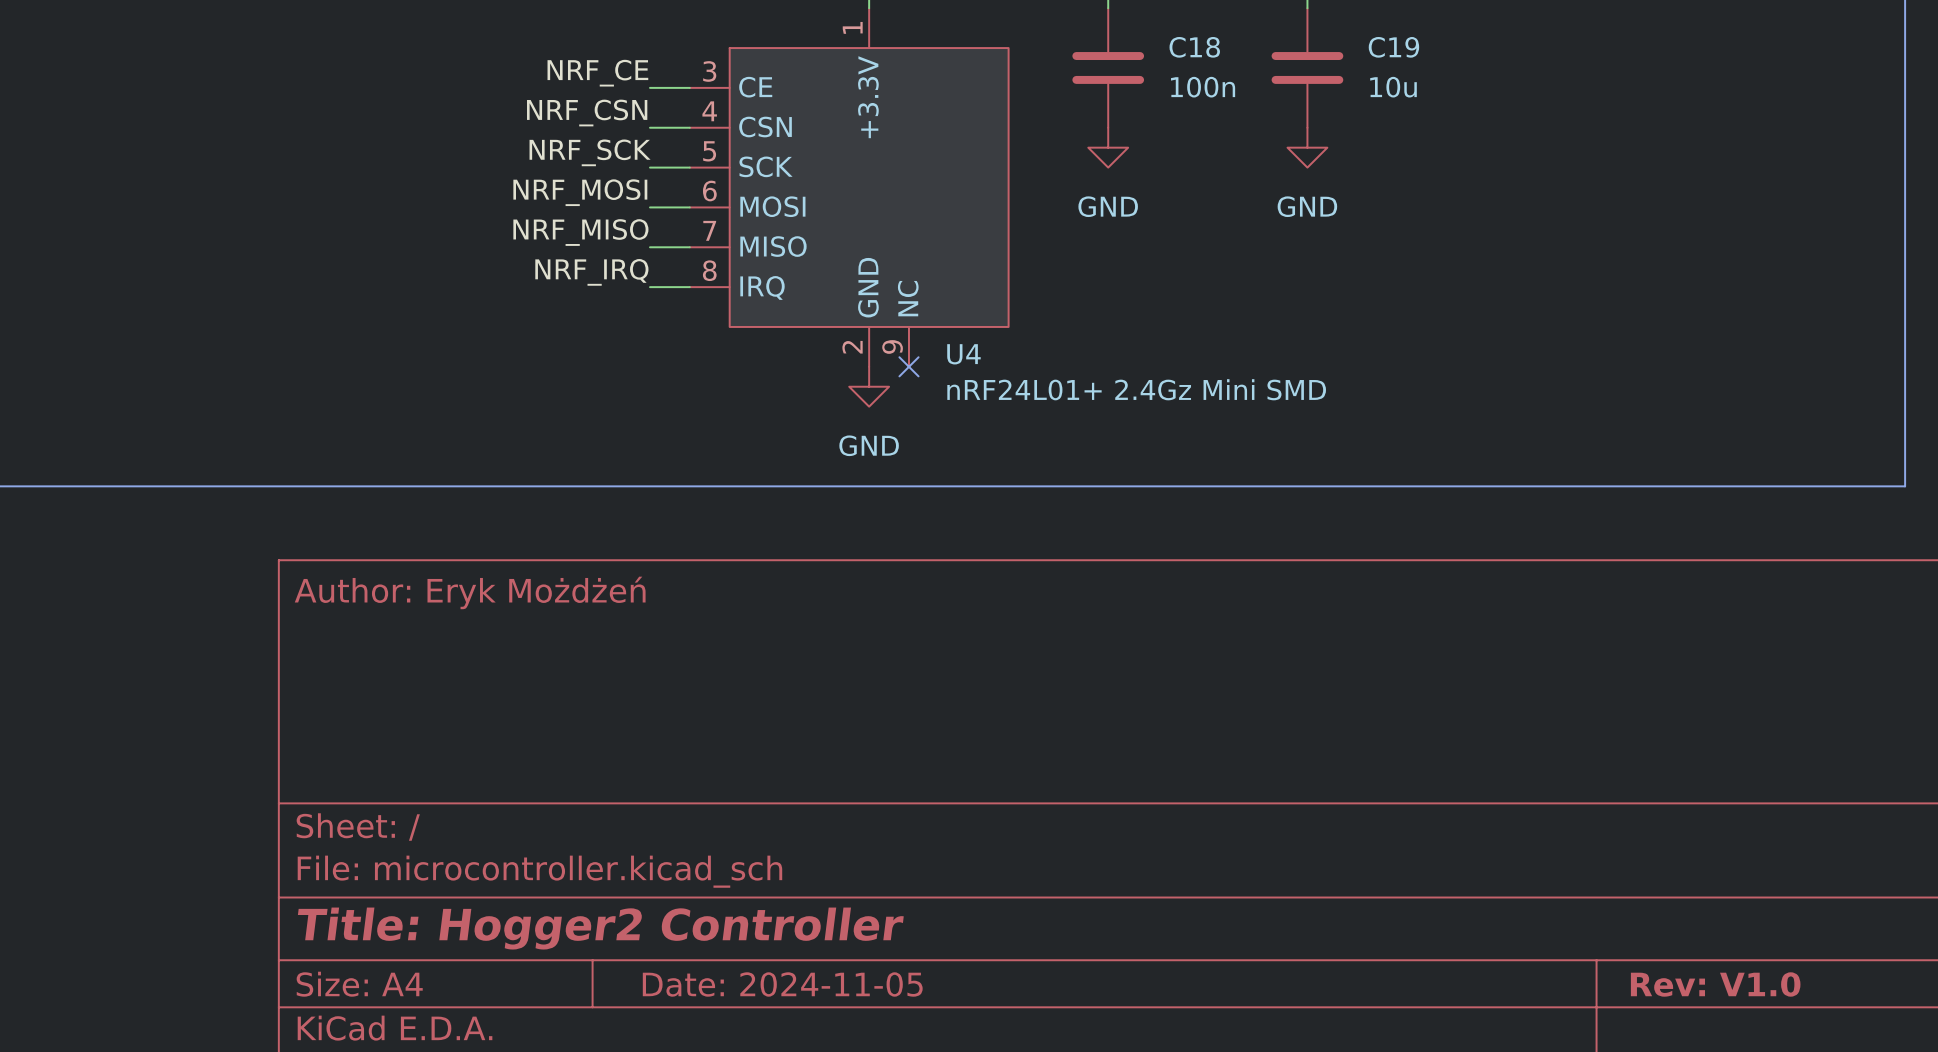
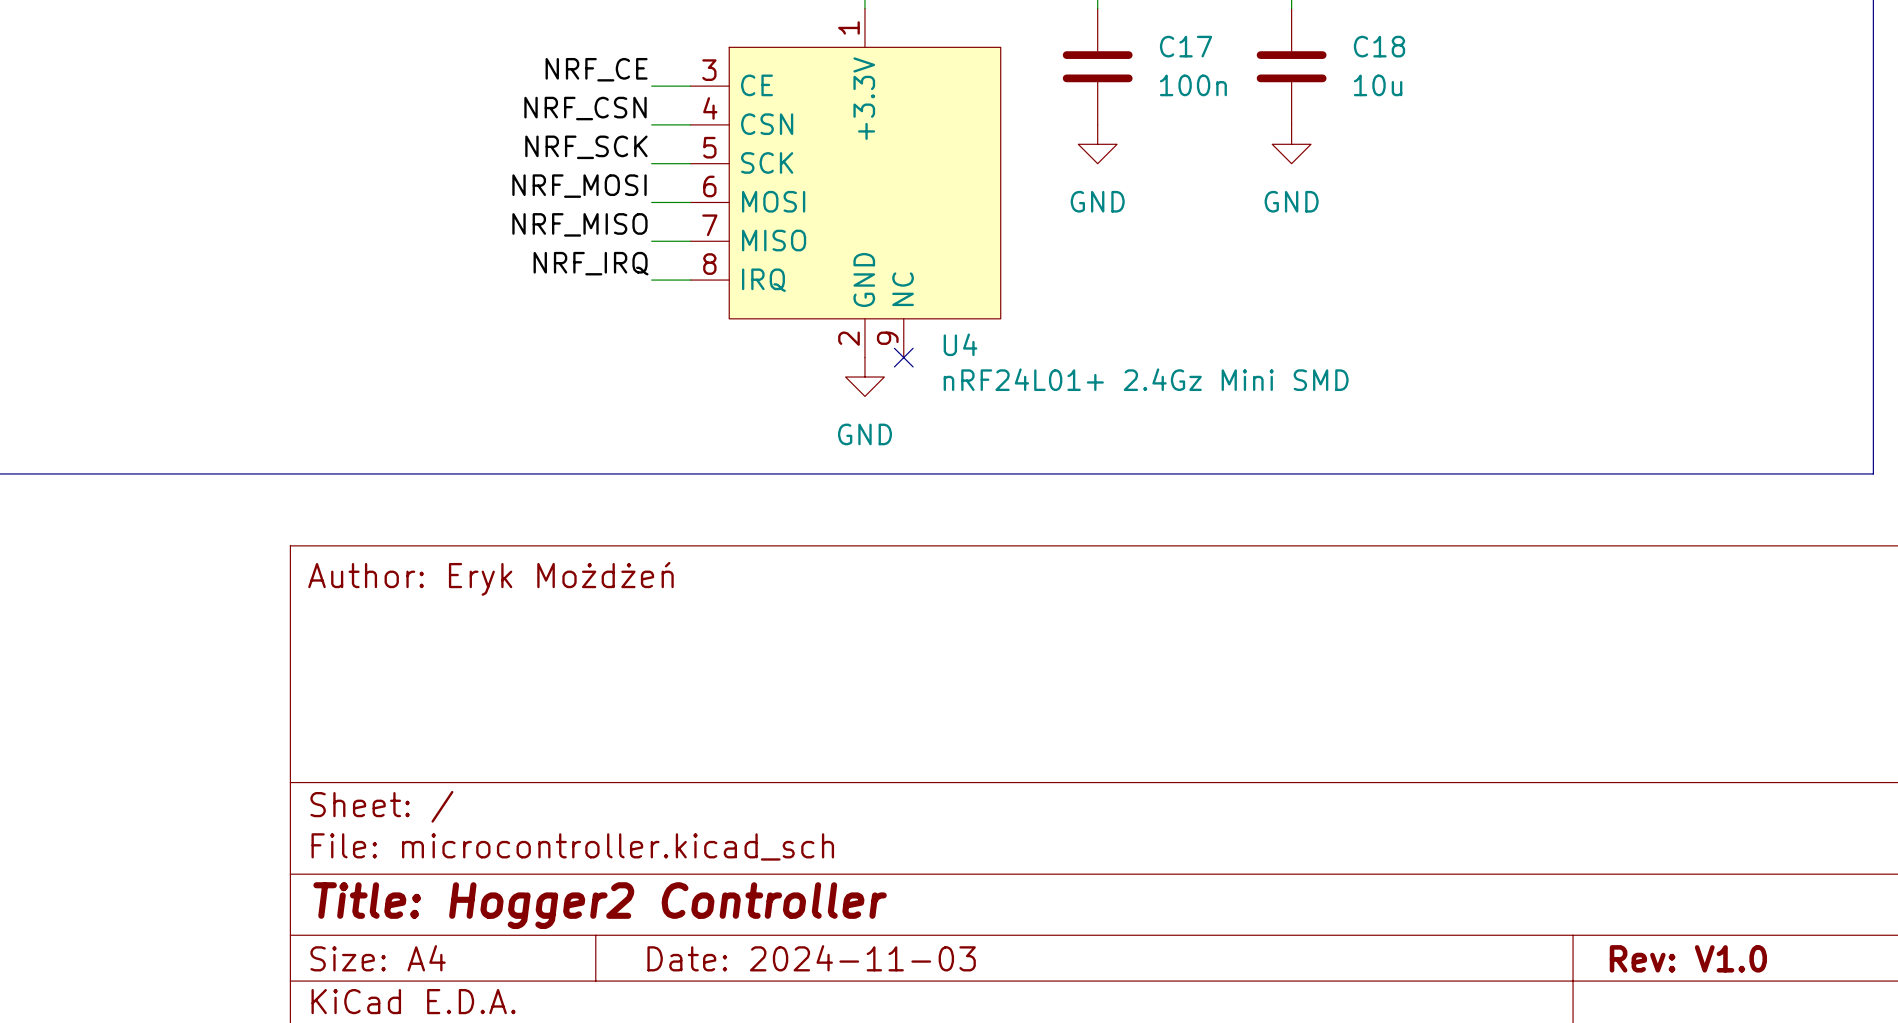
C18 name: C18 (1194, 47) -> C17 (1186, 46)
C19 name: C19 (1393, 47) -> C18 (1379, 46)
title block: Date: 2024-11-05 (782, 984) -> Date: 2024-11-03 (811, 958)

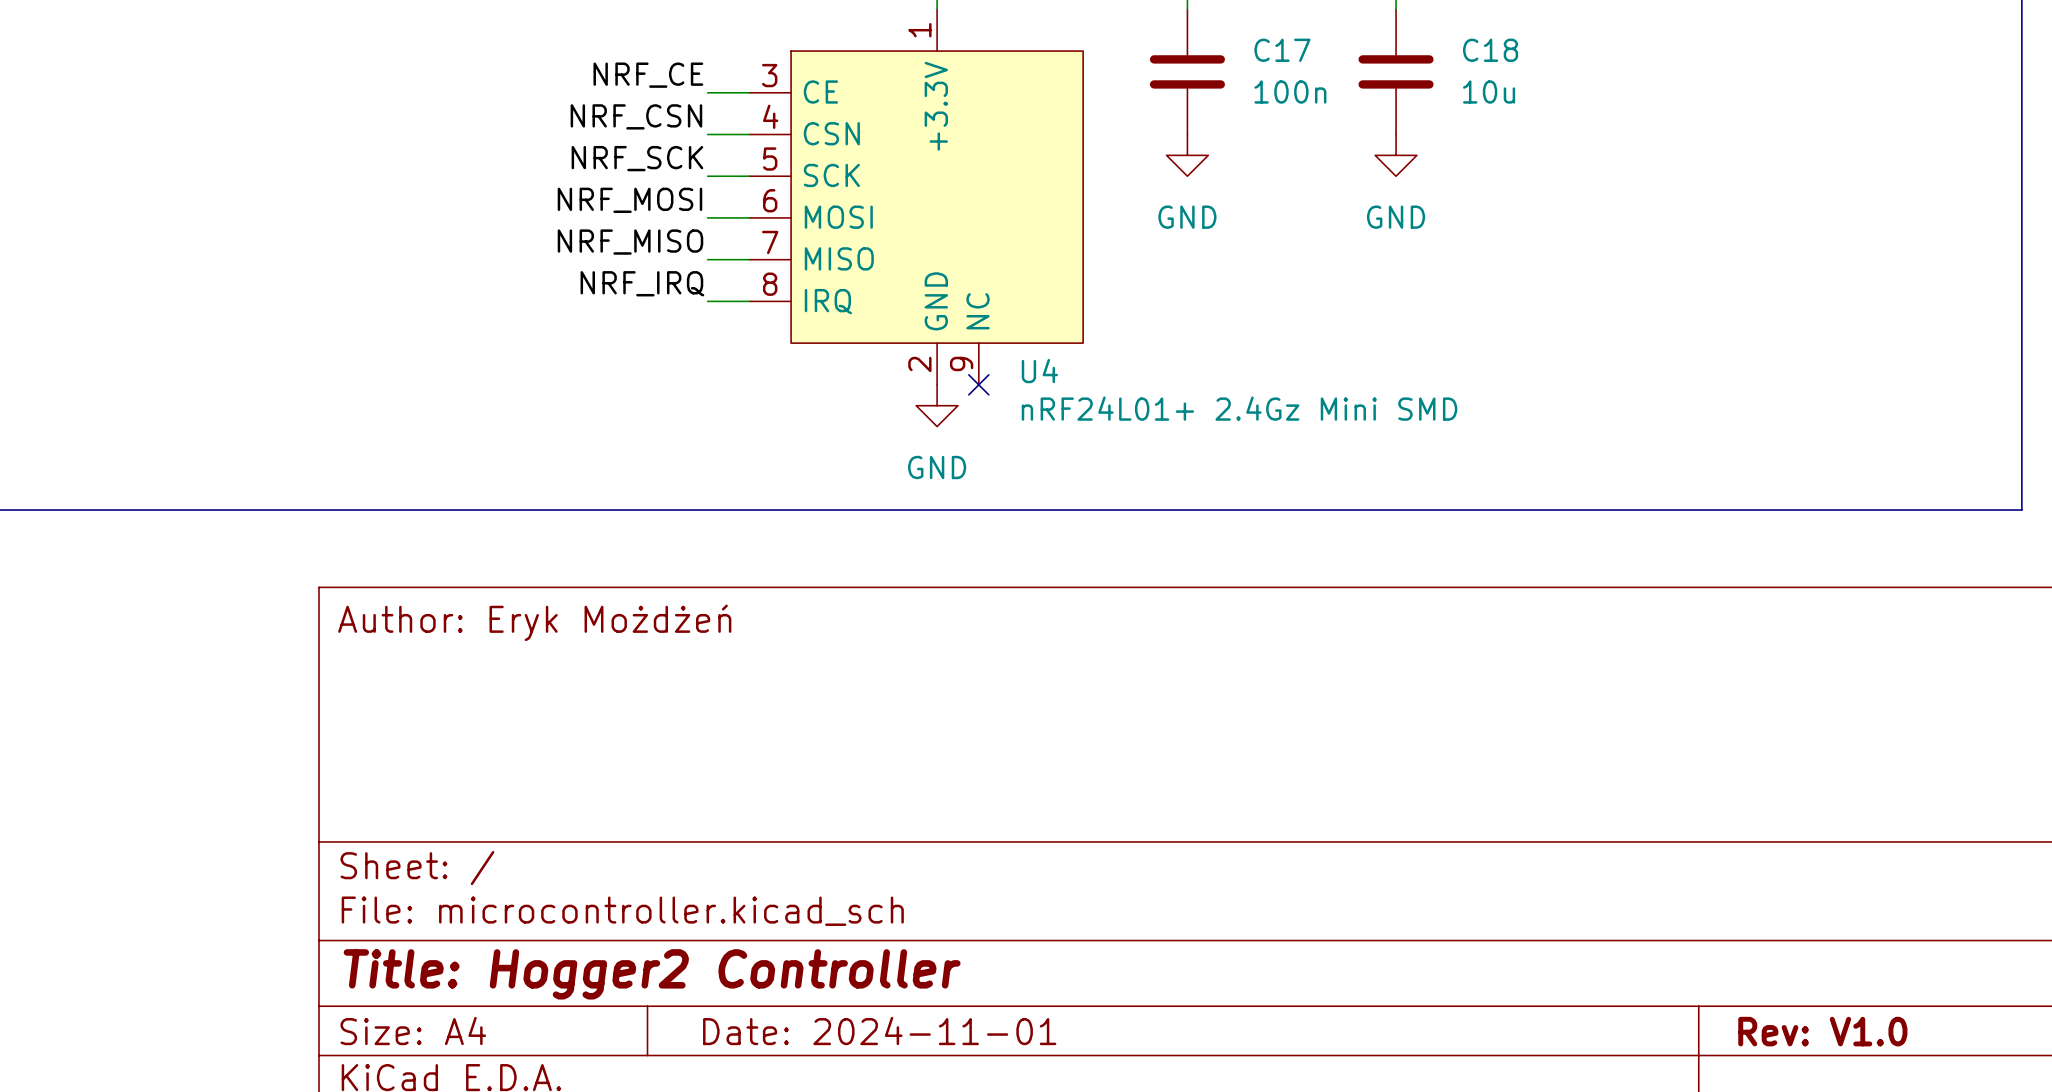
title block: Date: 2024-11-03 (811, 958) -> Date: 2024-11-01 (879, 1031)

